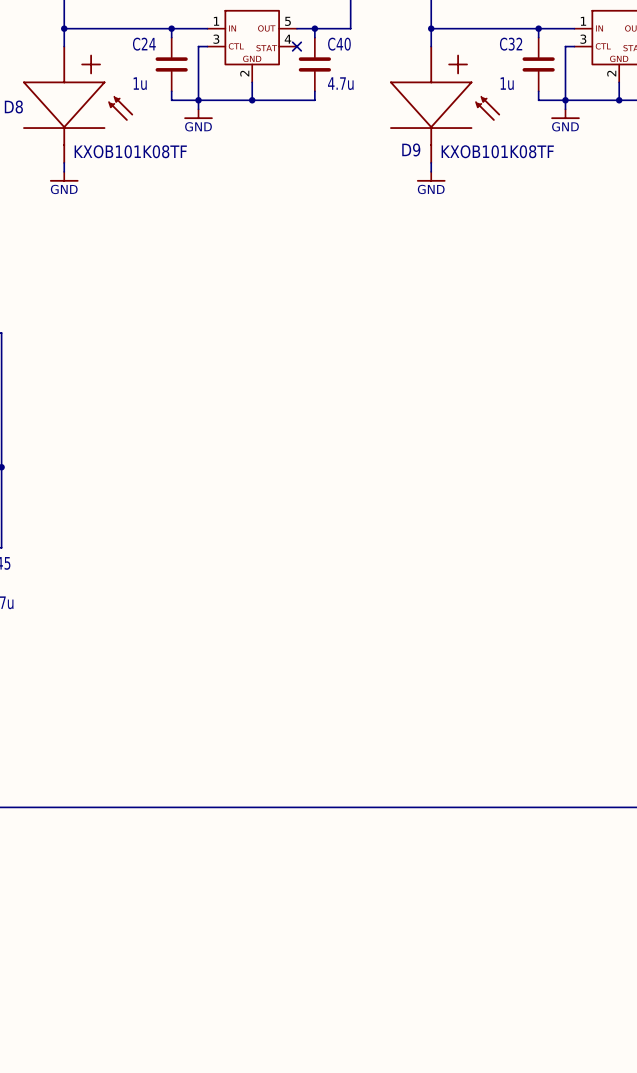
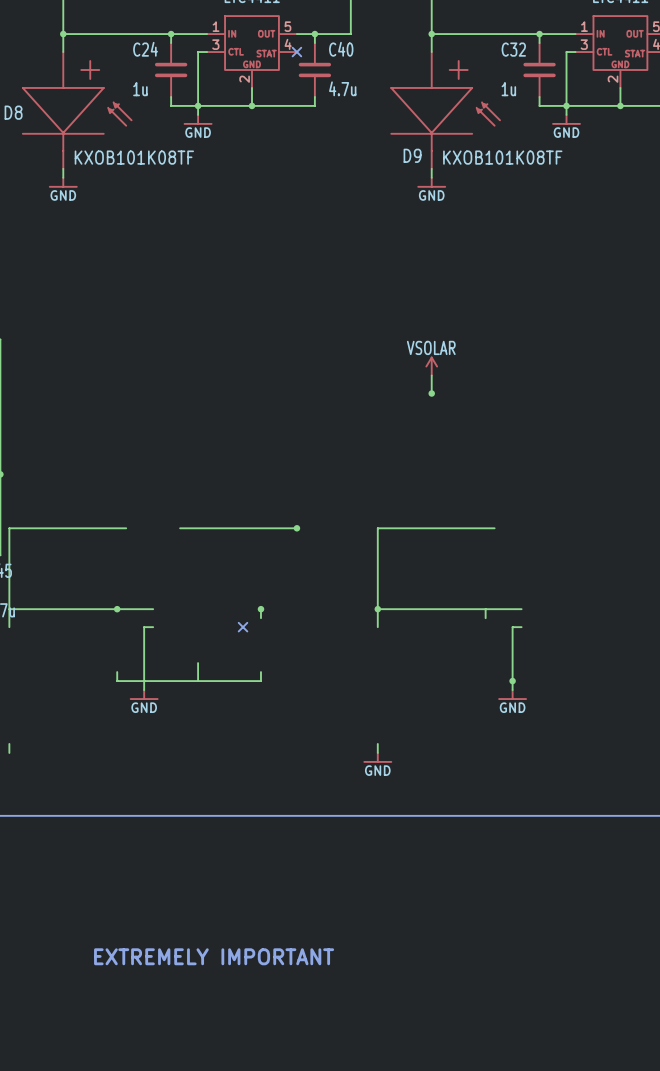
power symbol: none -> VSOLAR (431, 366)
wire: none -> (431, 375) (431, 393)
junction: none -> (431, 393)
wire: none -> (126, 528) (9, 528) (9, 627)
wire: none -> (180, 528) (296, 528)
junction: none -> (296, 528)
wire: none -> (494, 528) (377, 528) (377, 627)
wire: none -> (9, 609) (153, 609)
junction: none -> (117, 609)
wire: none -> (260, 609) (260, 618)
junction: none -> (260, 609)
wire: none -> (377, 609) (521, 609)
junction: none -> (377, 609)
wire: none -> (485, 609) (485, 618)
wire: none -> (153, 627) (144, 627) (144, 690)
no-connect mark: none -> (243, 627)
wire: none -> (521, 627) (512, 627) (512, 690)
wire: none -> (198, 663) (198, 681)
wire: none -> (117, 672) (117, 681) (260, 681) (260, 672)
junction: none -> (512, 681)
power symbol: none -> GND (144, 694)
power symbol: none -> GND (512, 694)
wire: none -> (9, 743) (9, 752)
wire: none -> (377, 743) (377, 752)
power symbol: none -> GND (377, 757)
text: none -> EXTREMELY IMPORTANT (214, 956)

